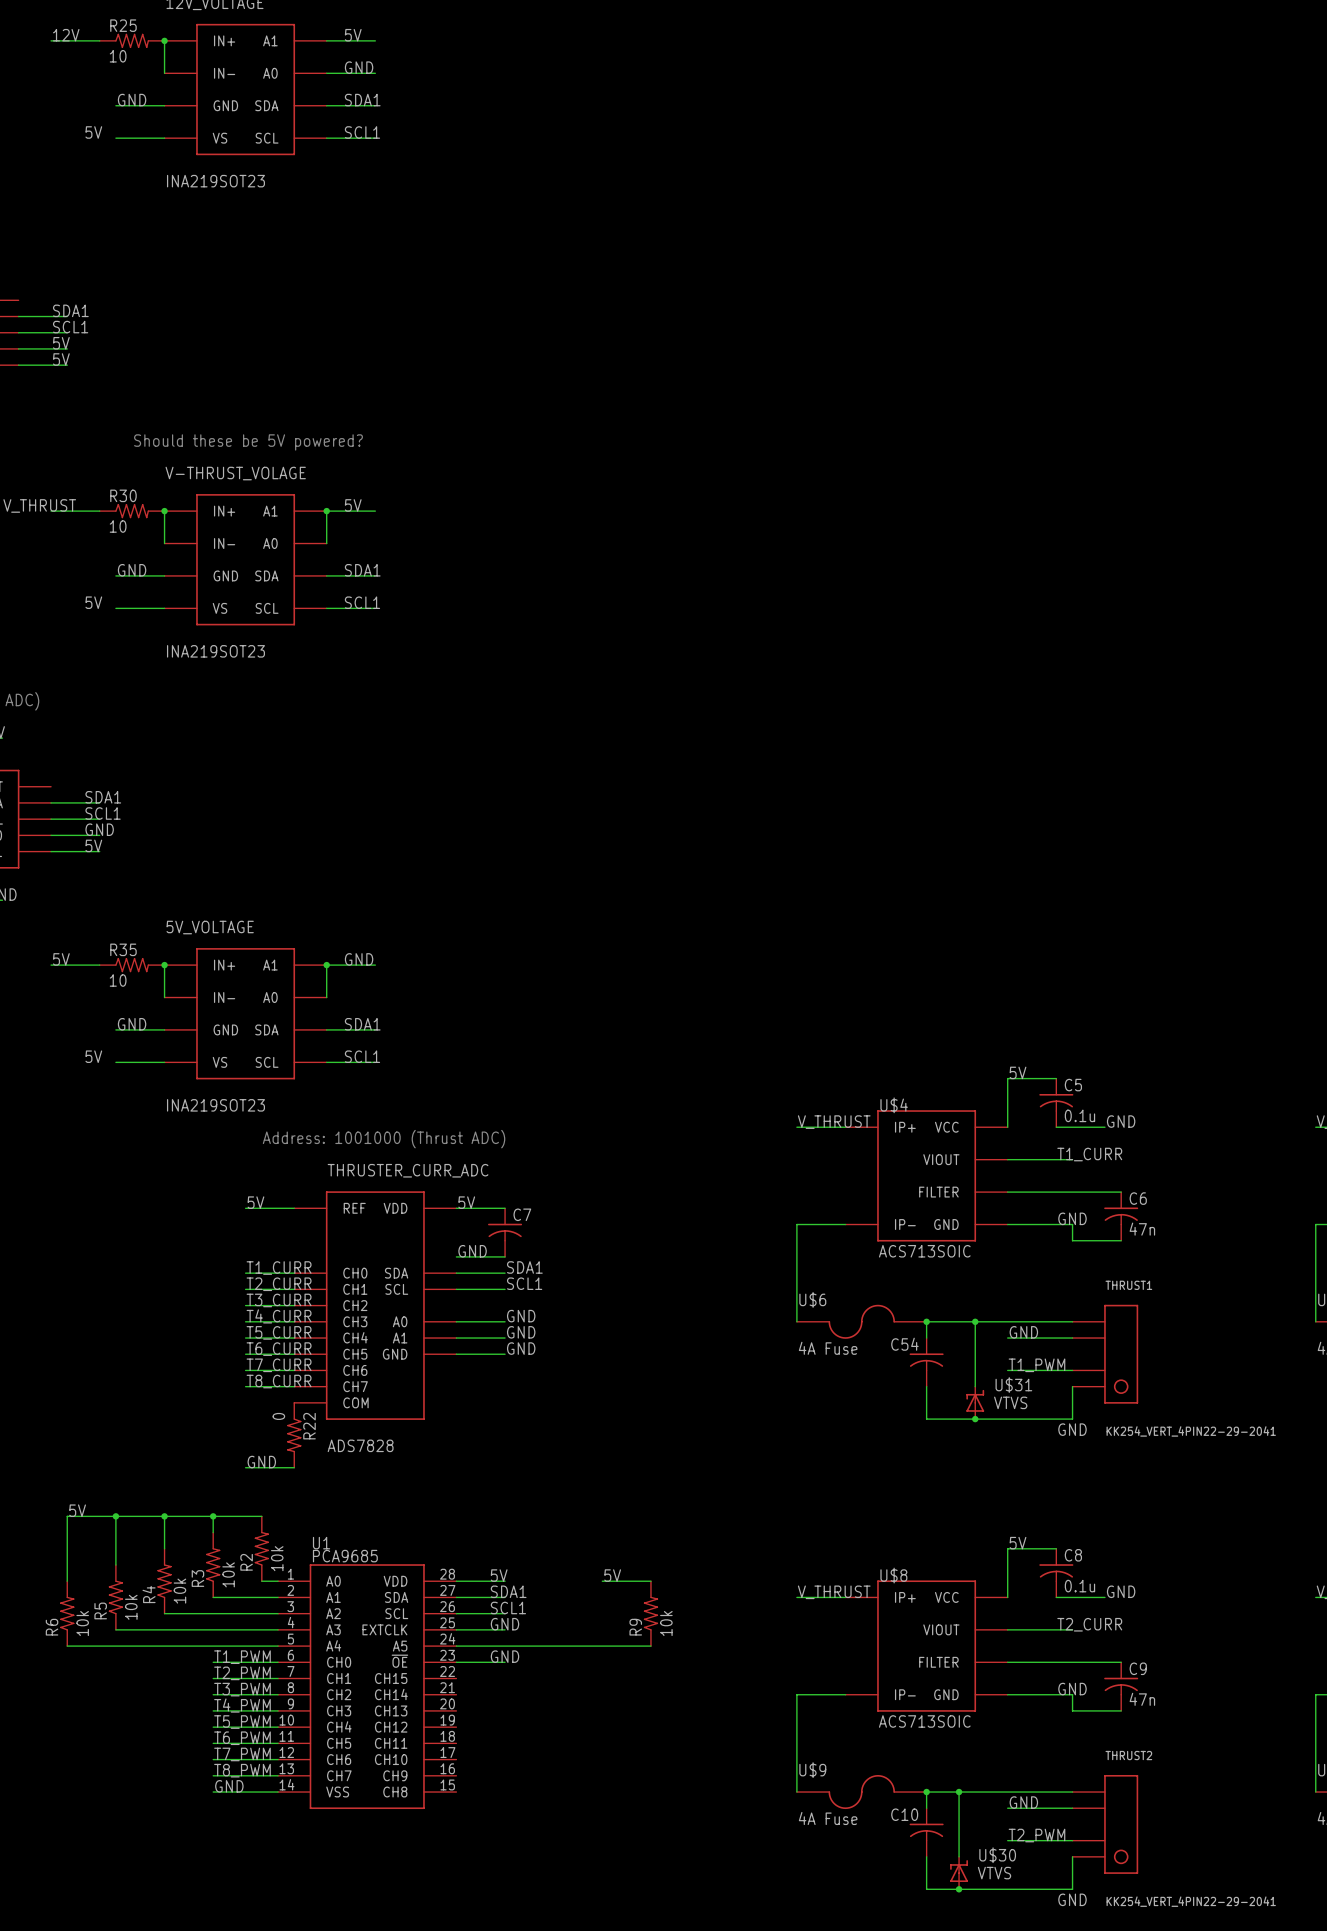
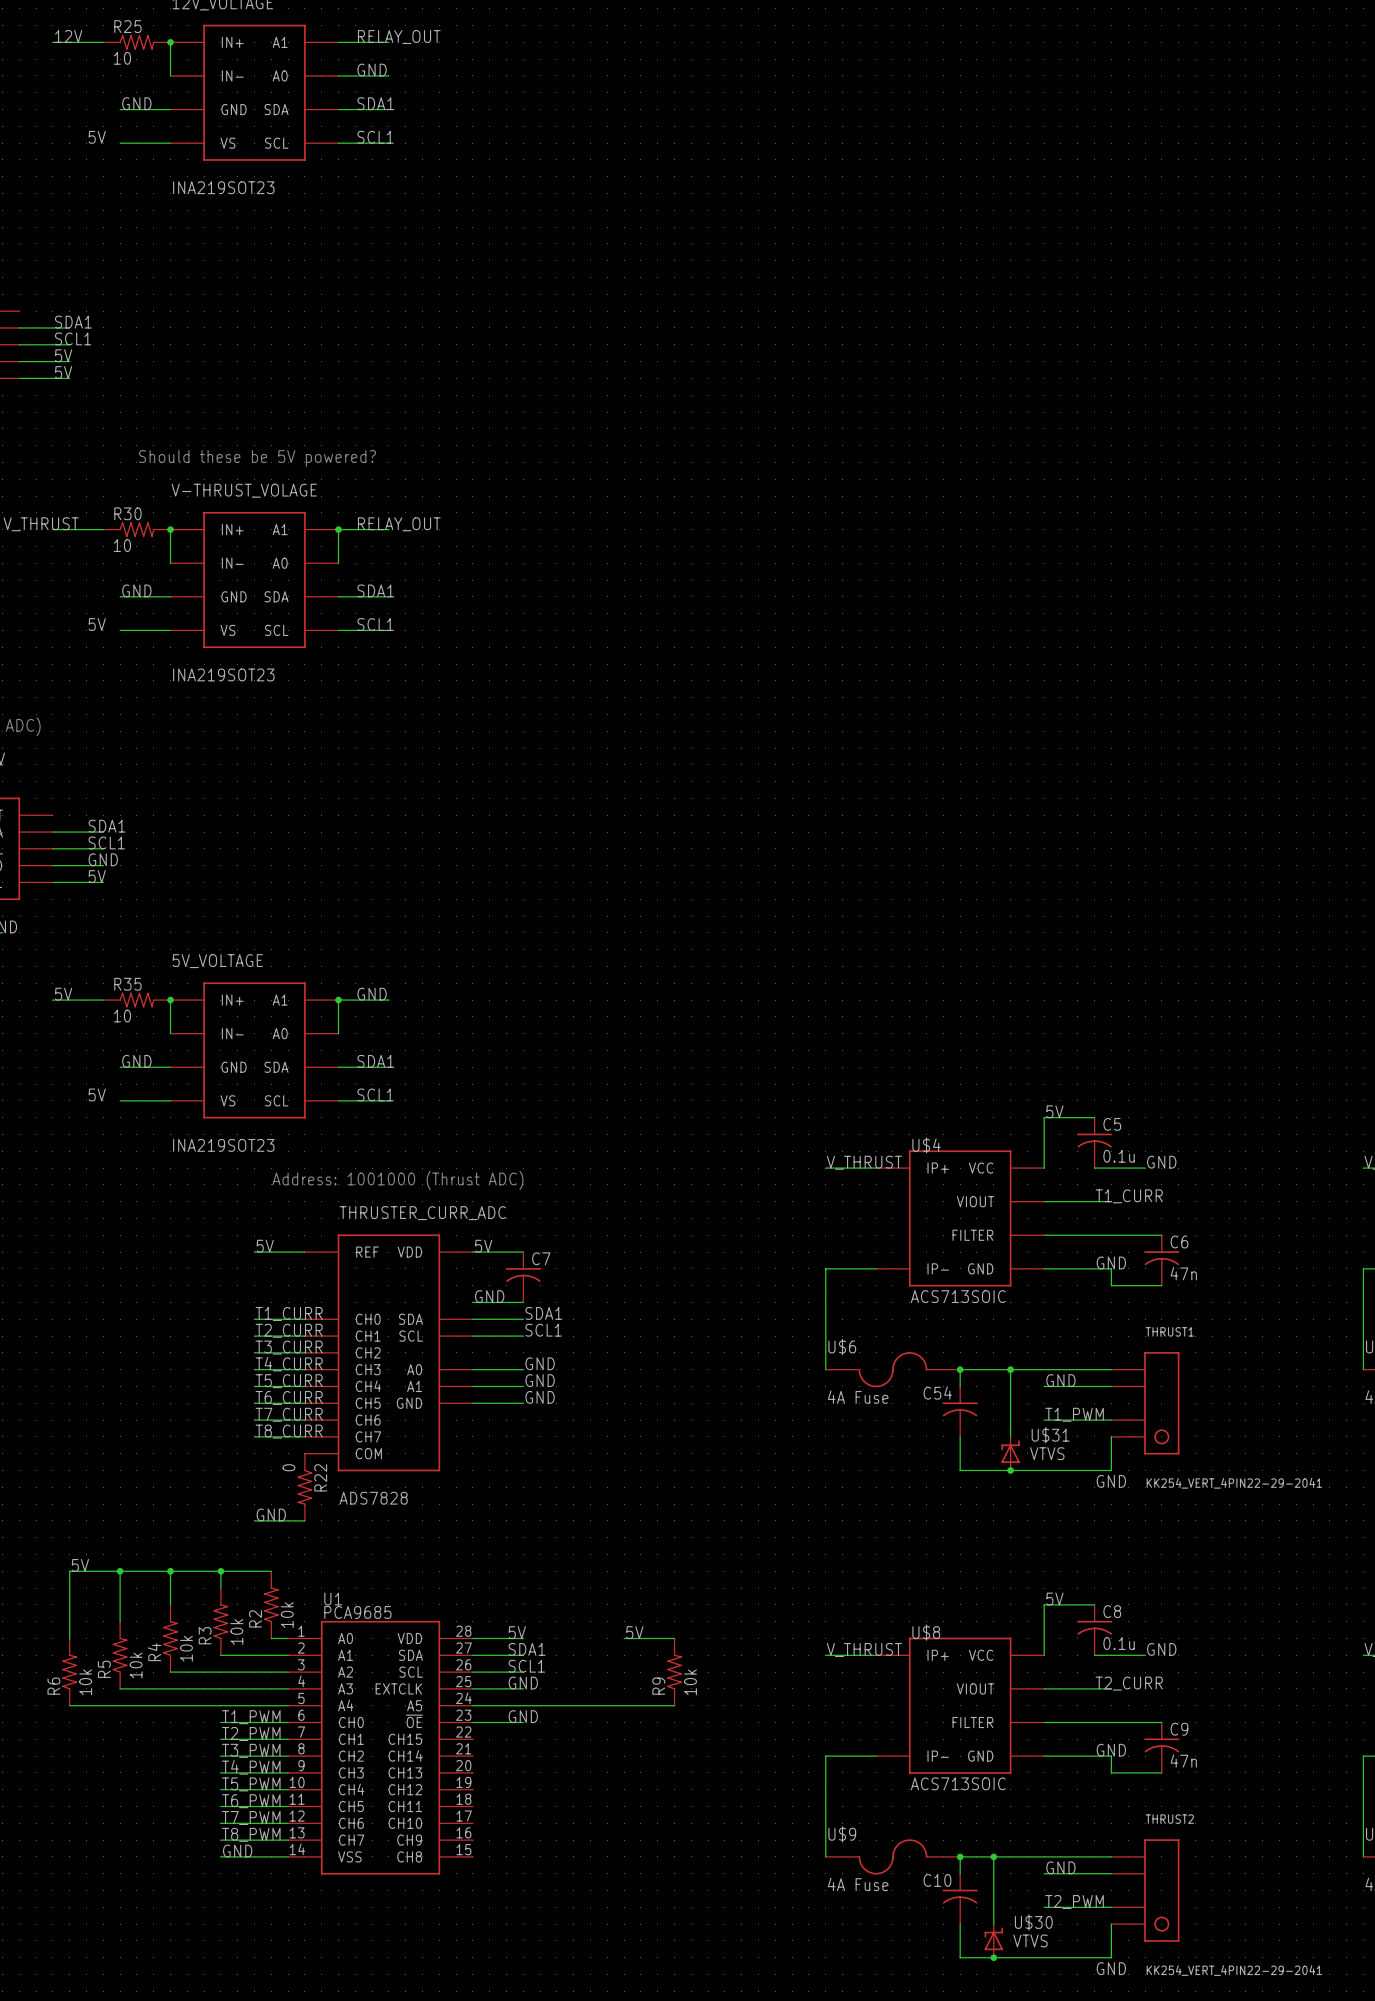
label: 5V (353, 35) -> RELAY_OUT (399, 37)
label: 5V (353, 505) -> RELAY_OUT (399, 524)

